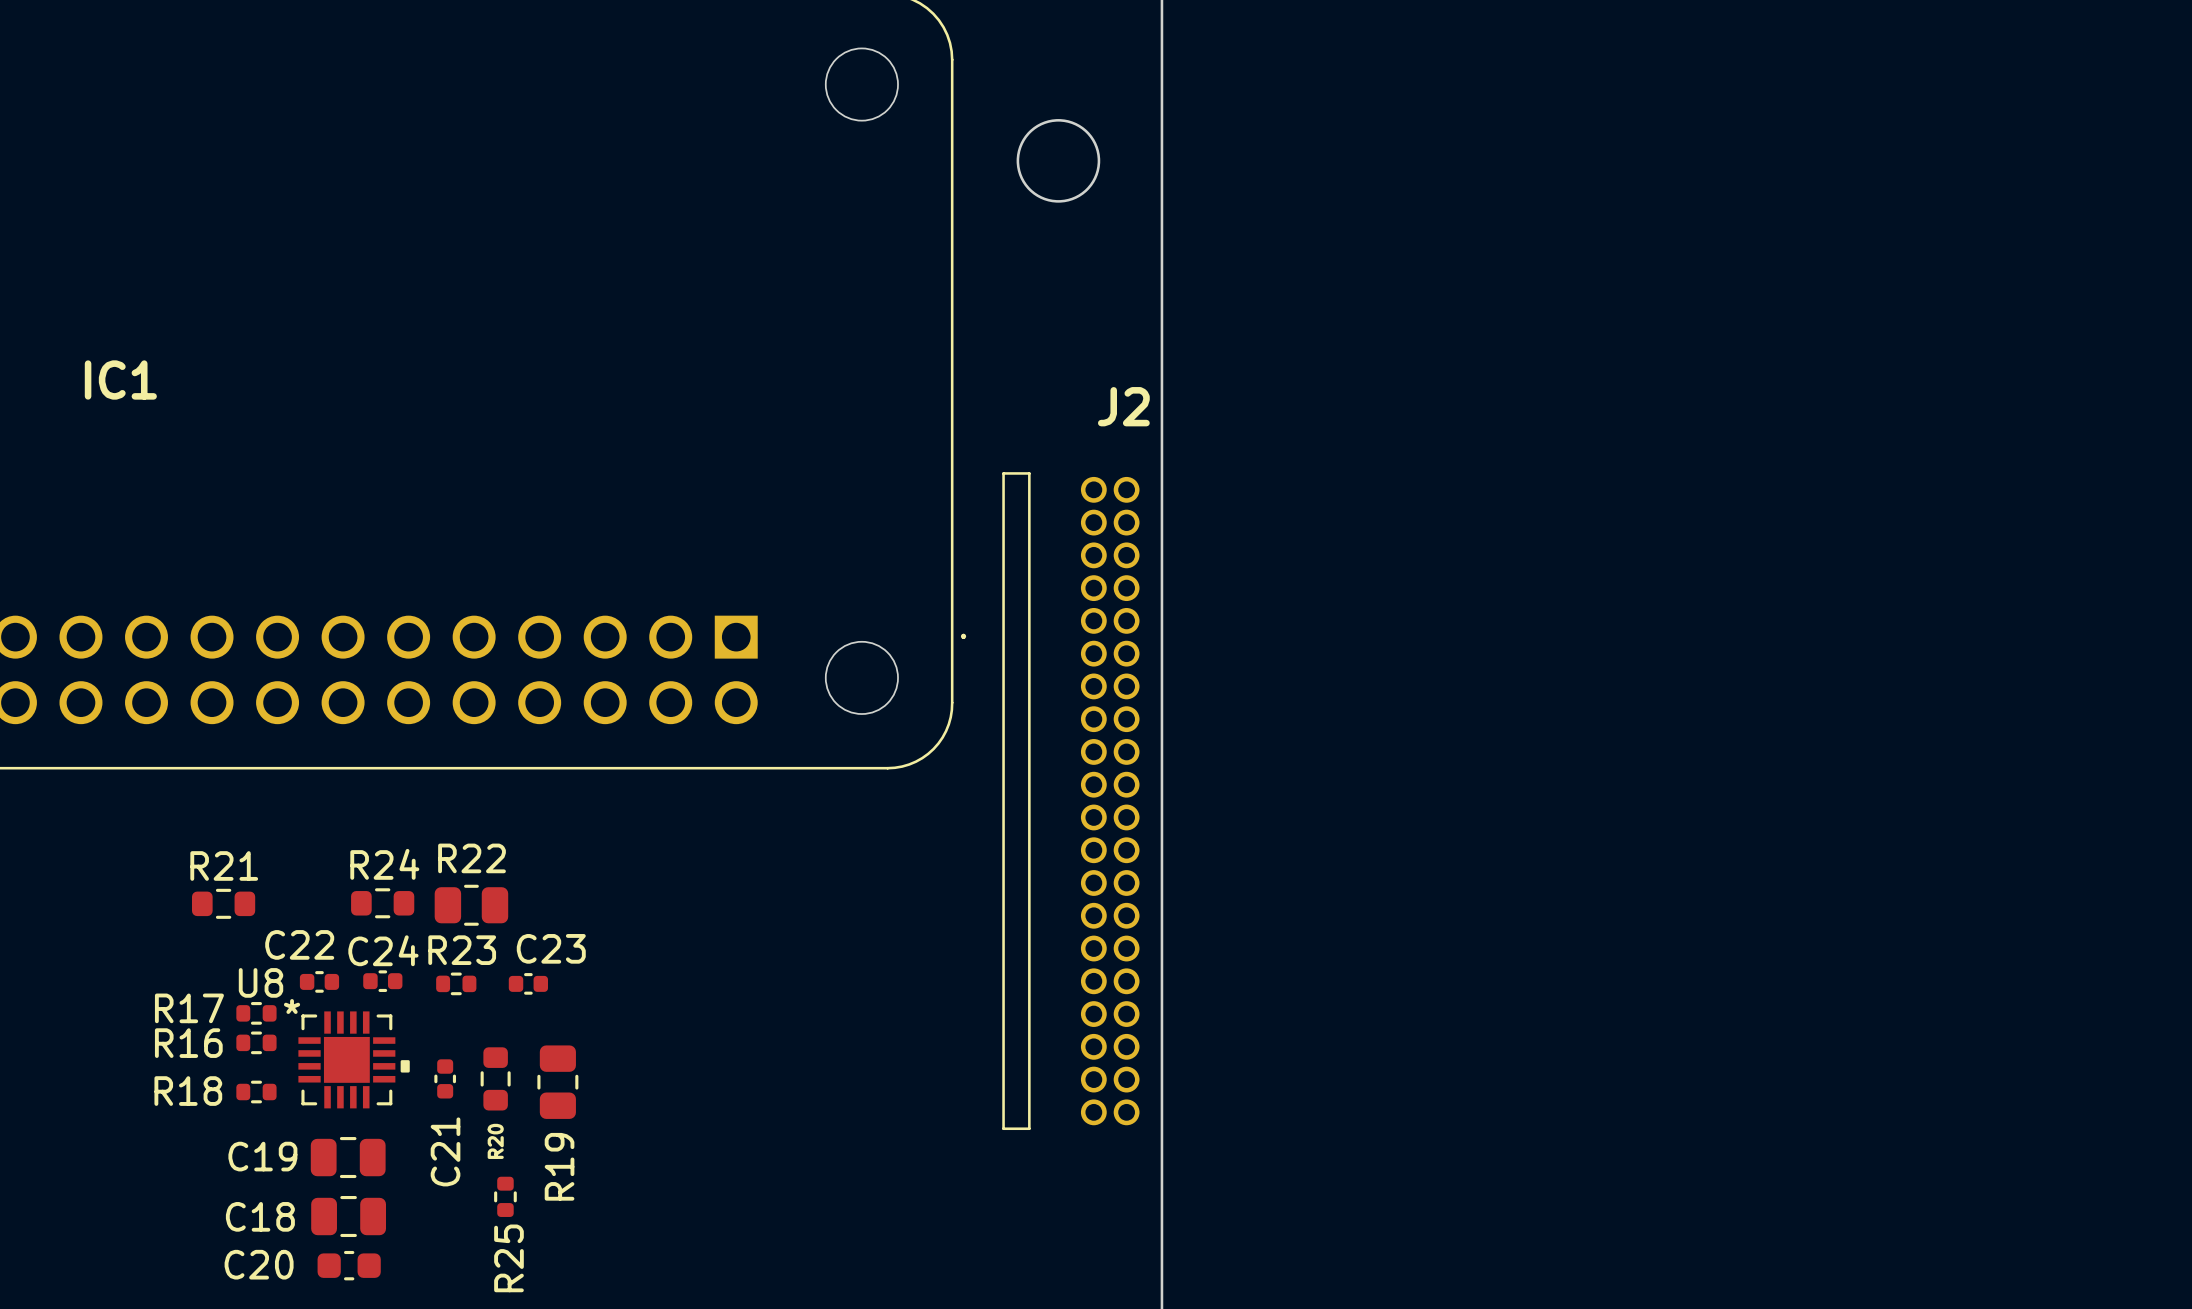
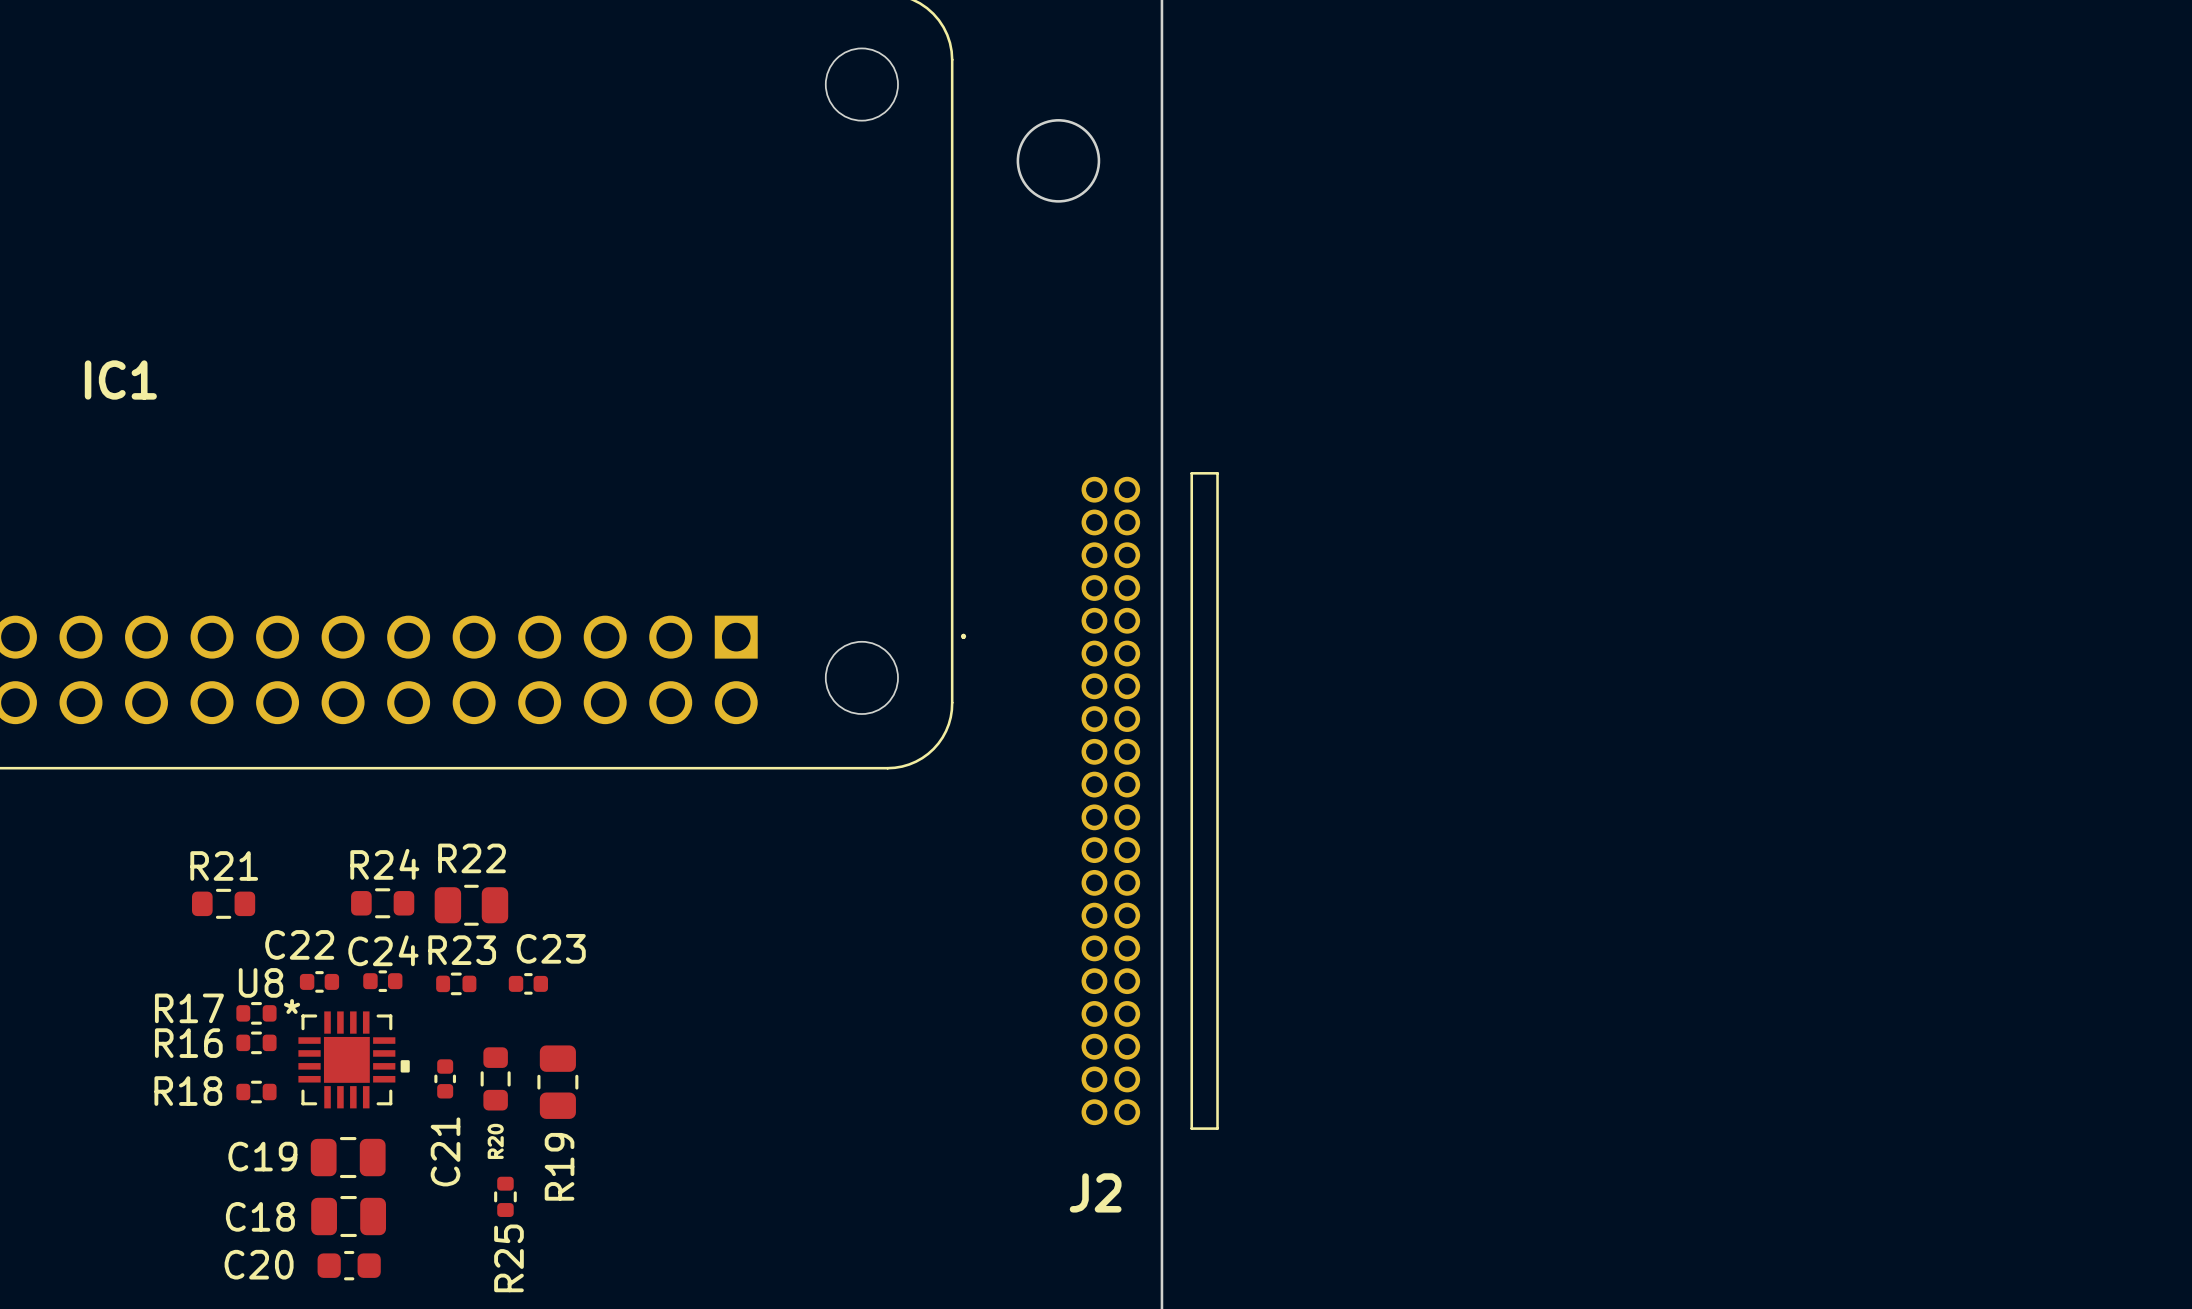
J2 rotation: 0° (1070, 801) -> 180° (1150, 800)

